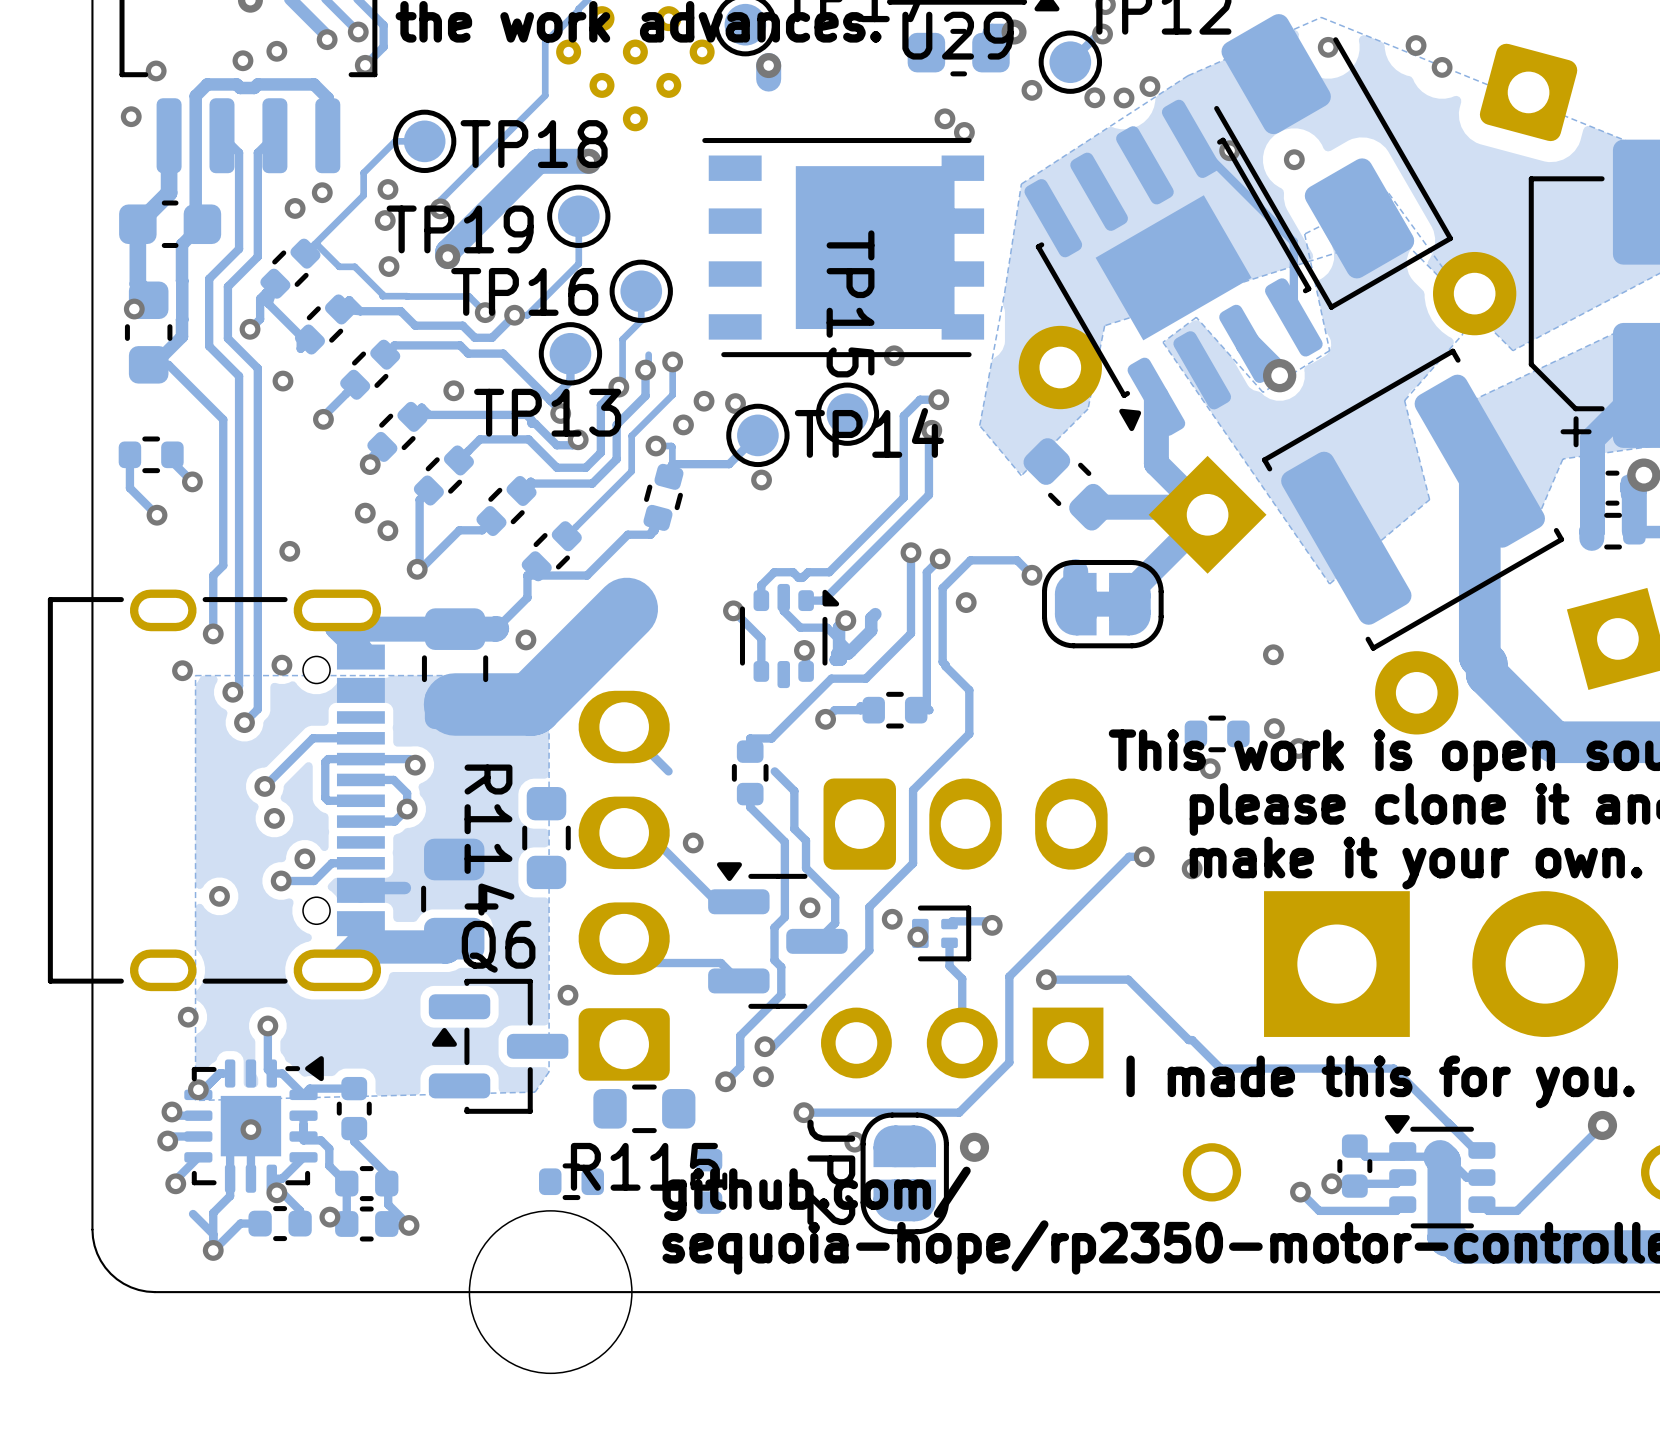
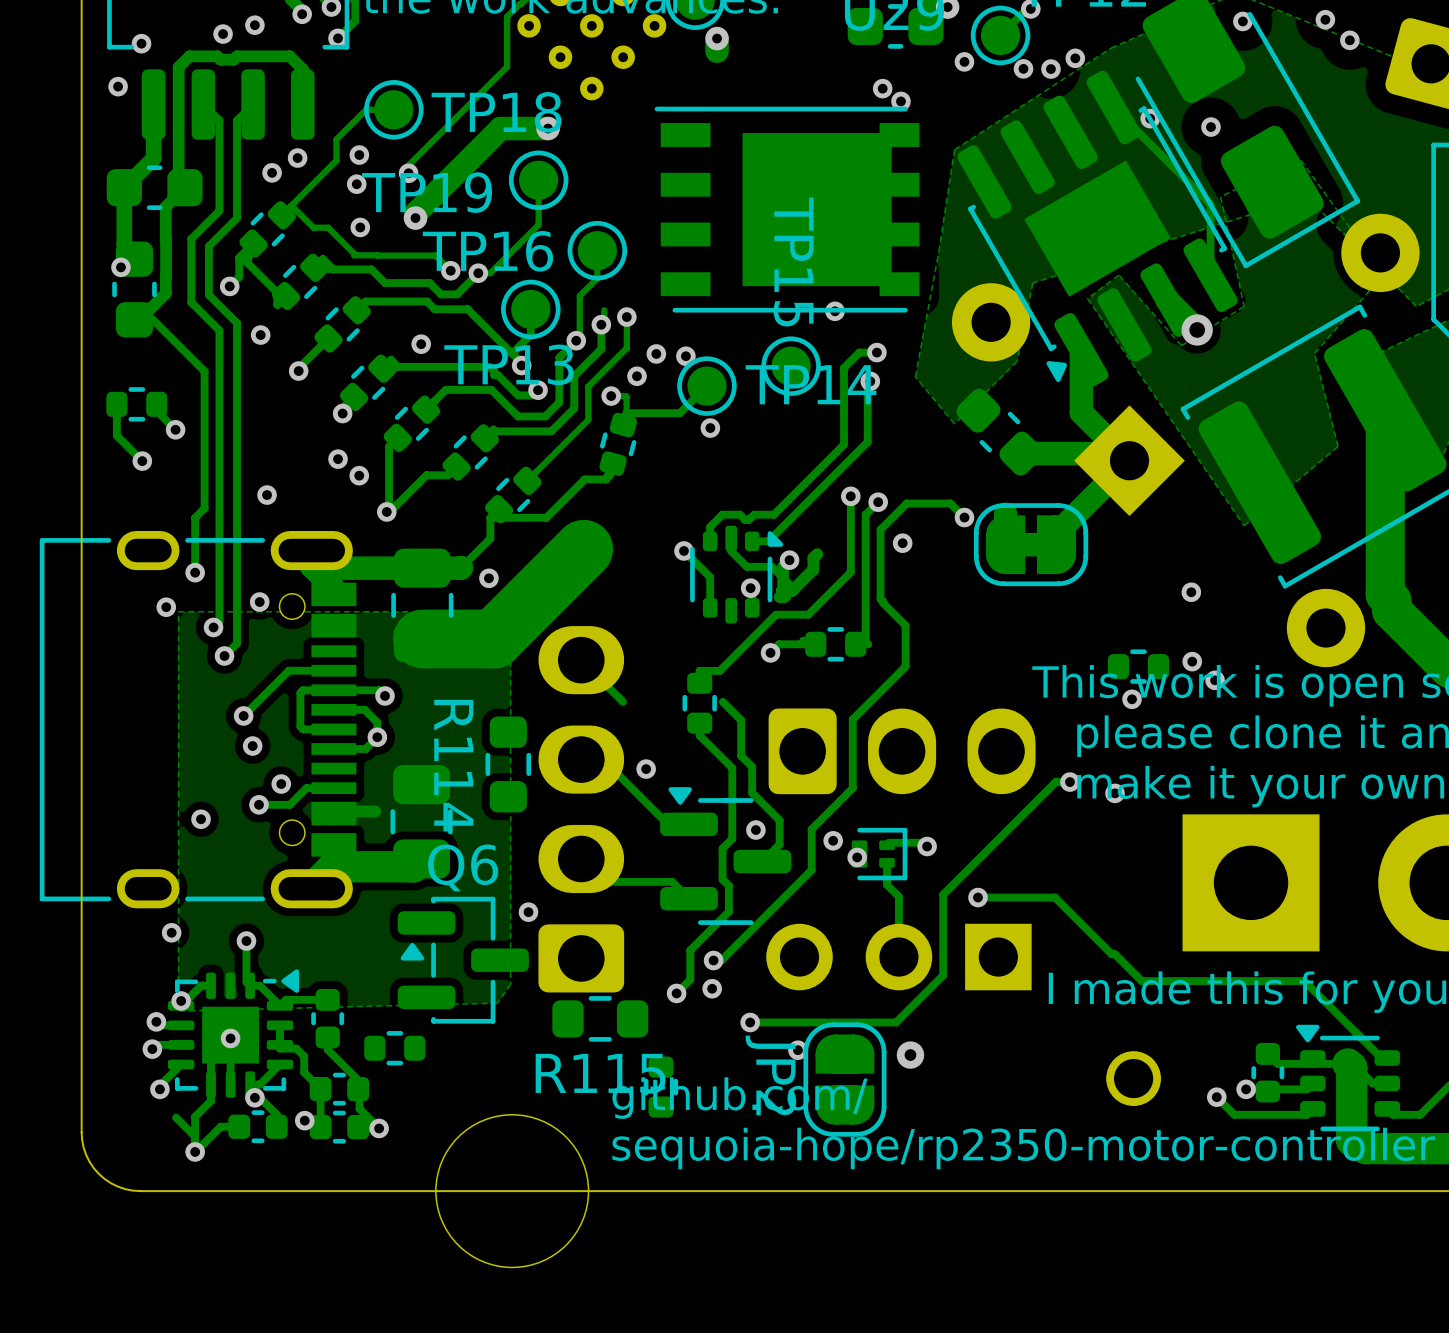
part position: (571, 1181) -> (394, 1048)

